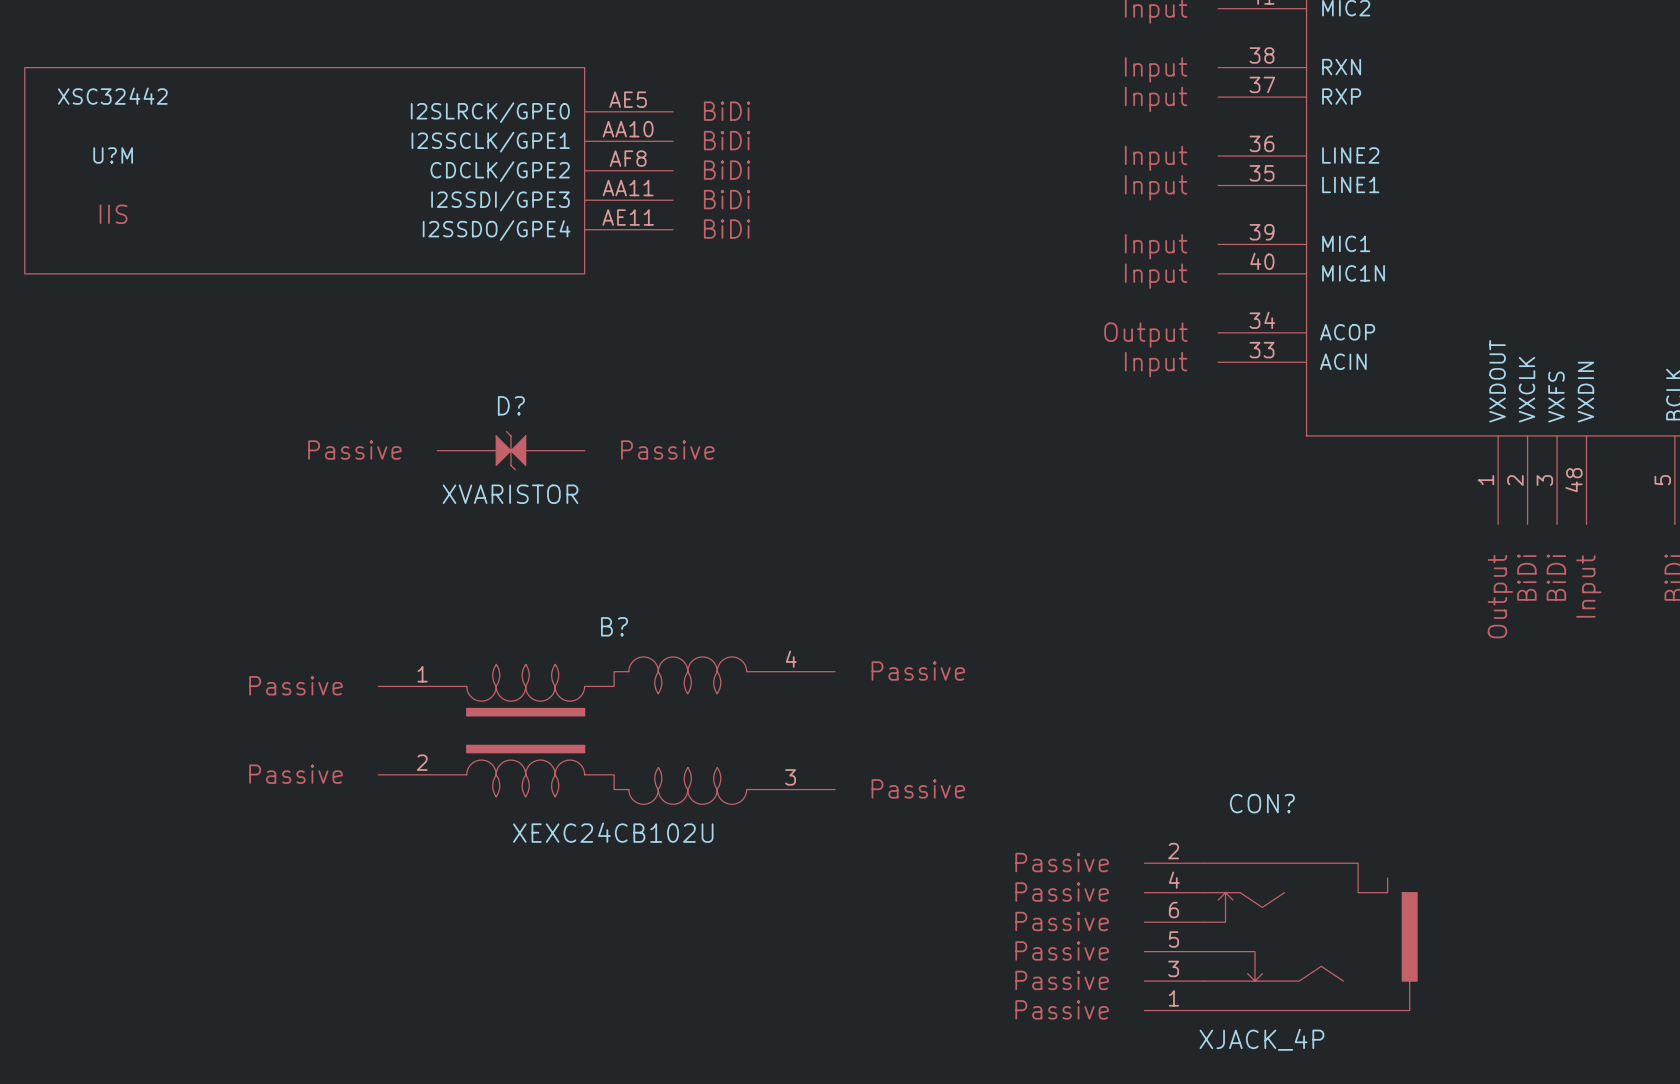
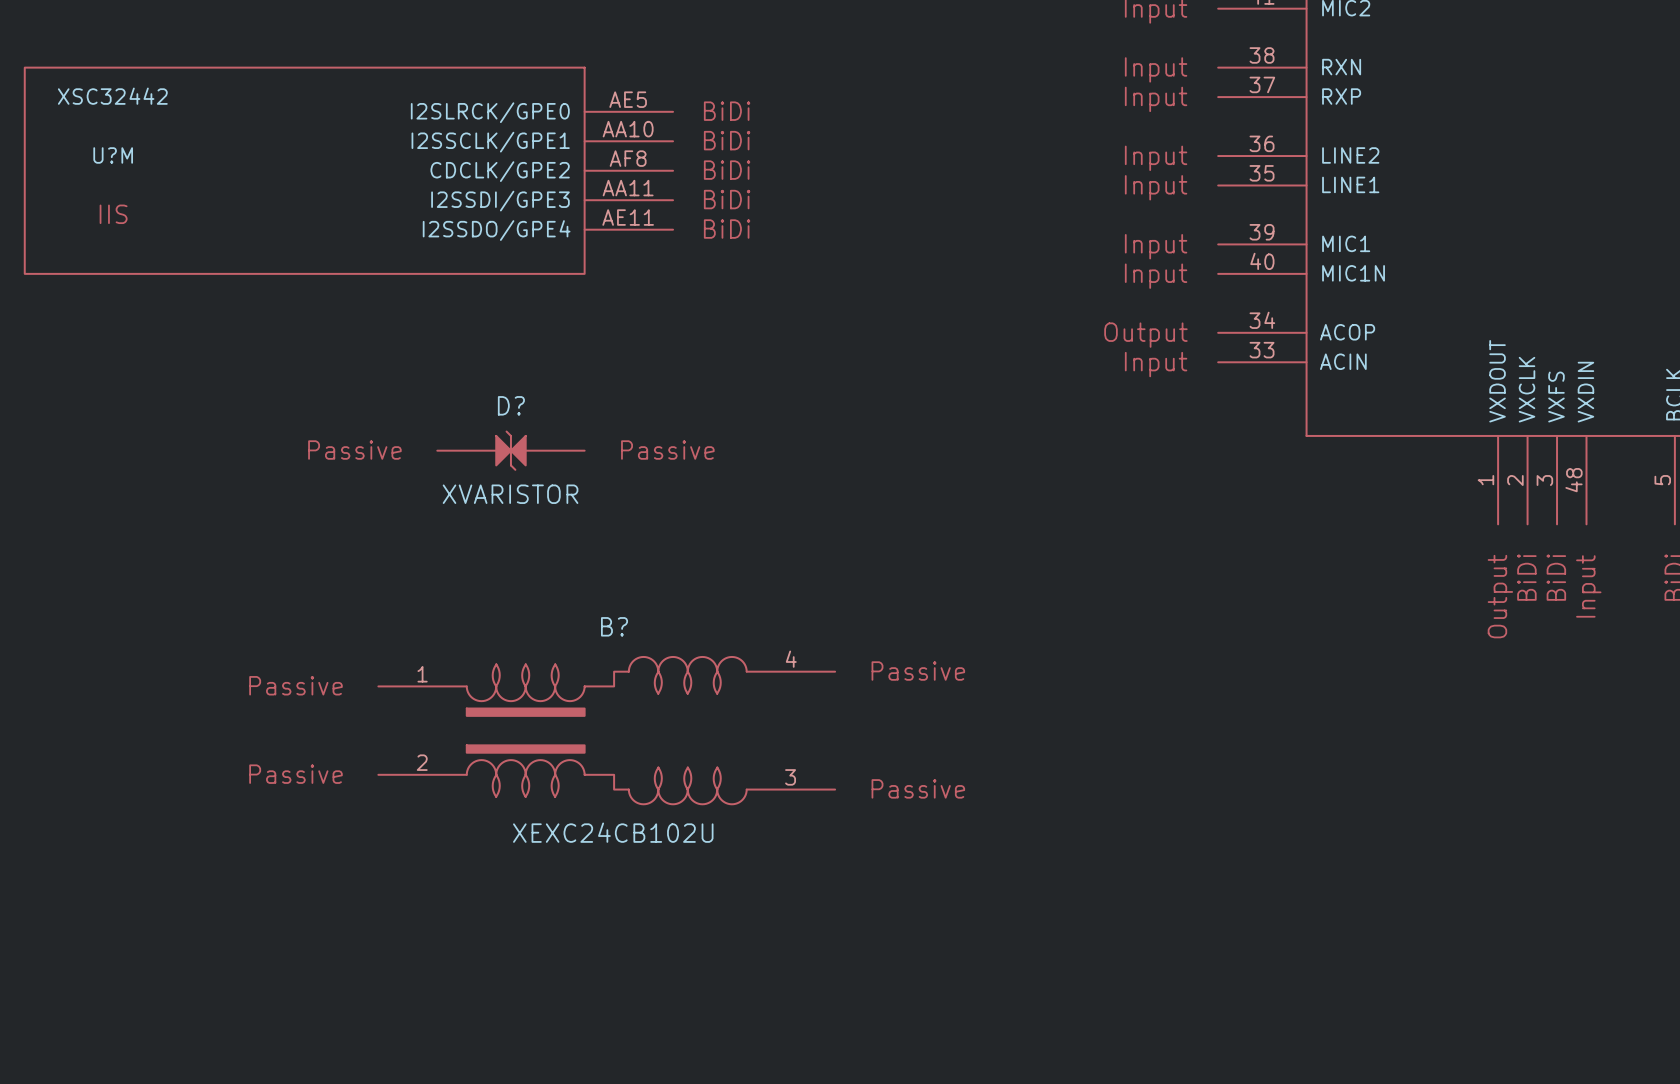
CON?: XJACK_4P (1280, 936) -> none

